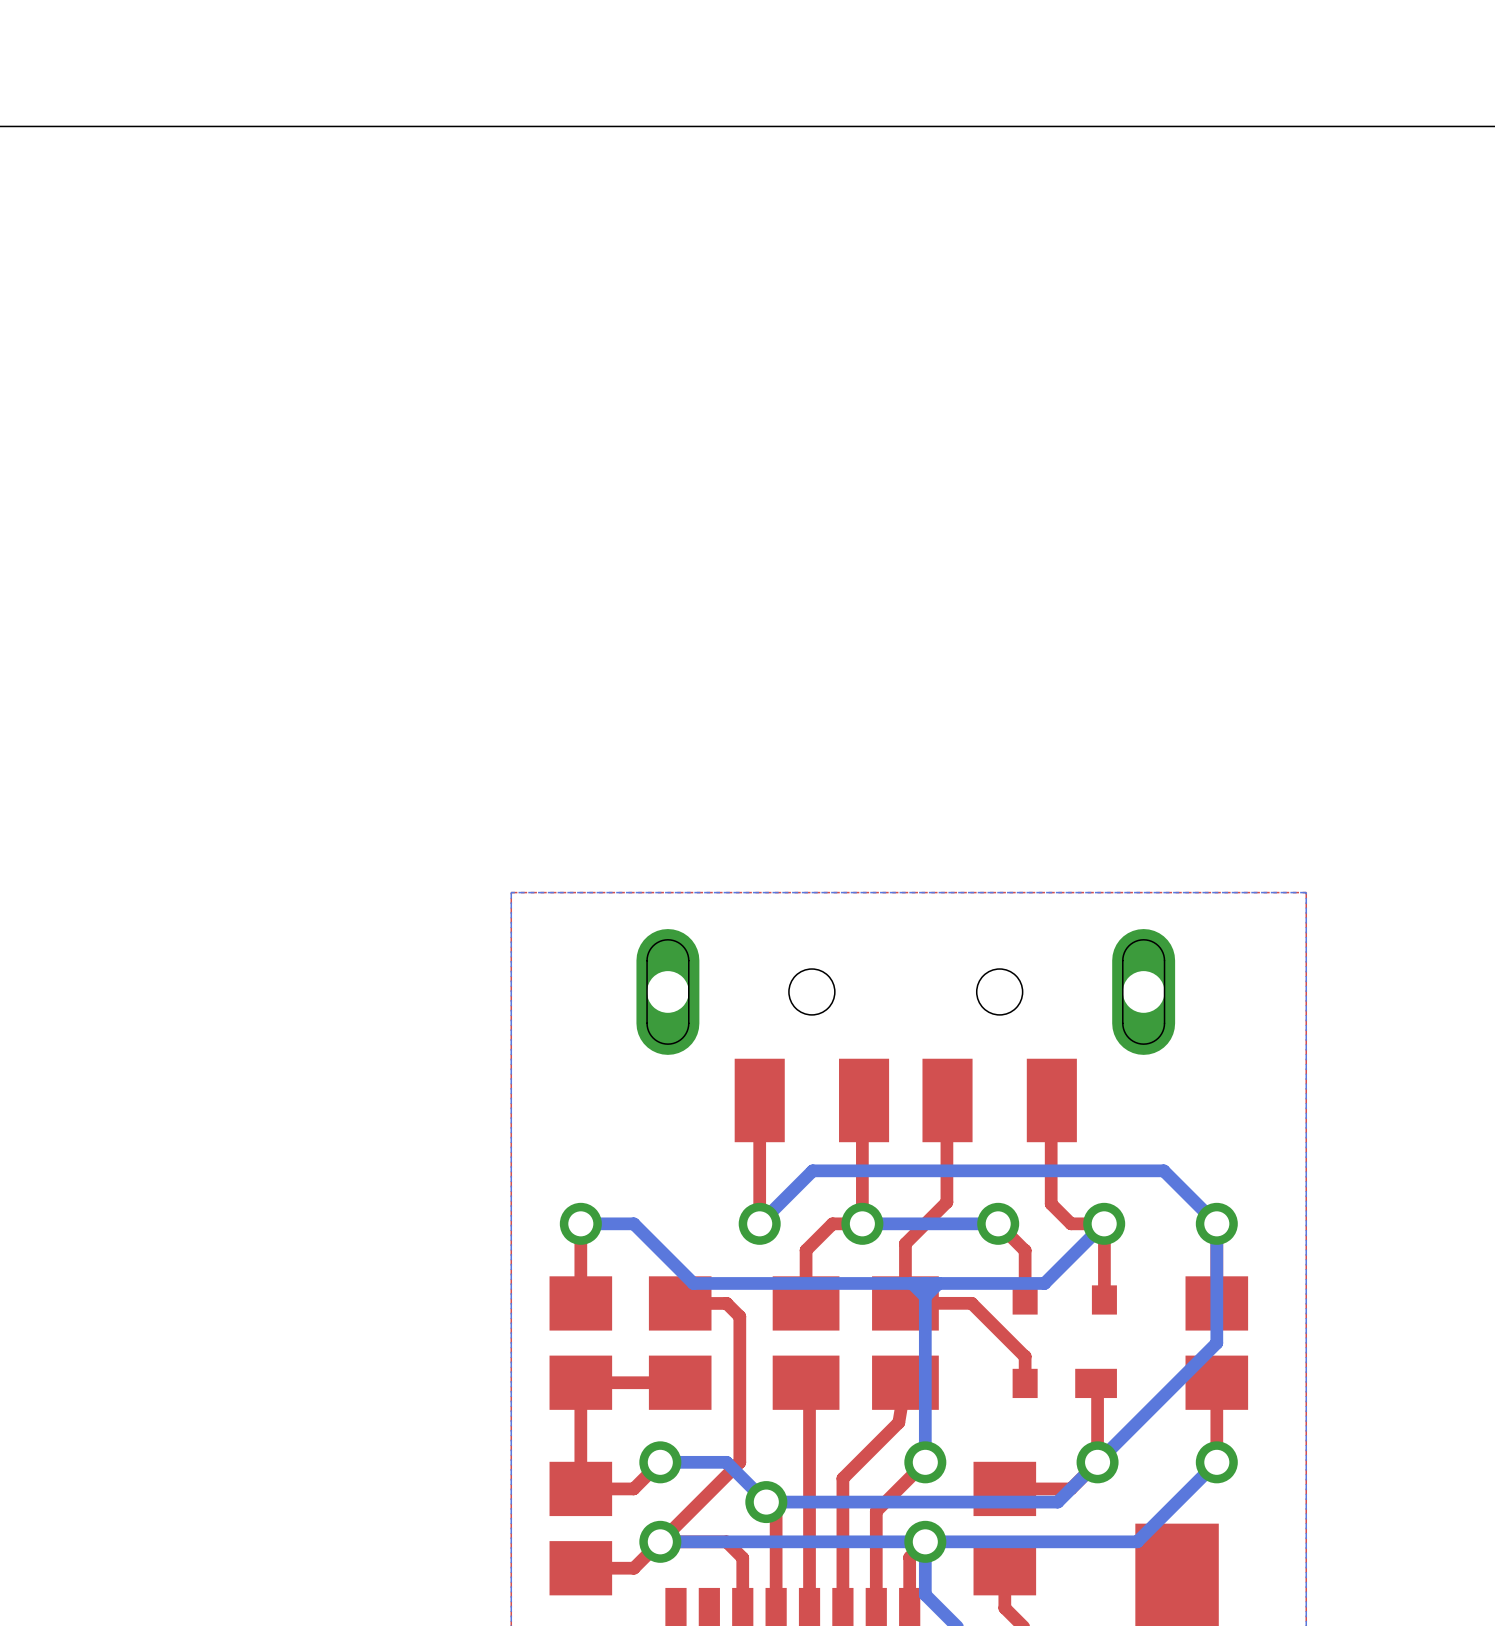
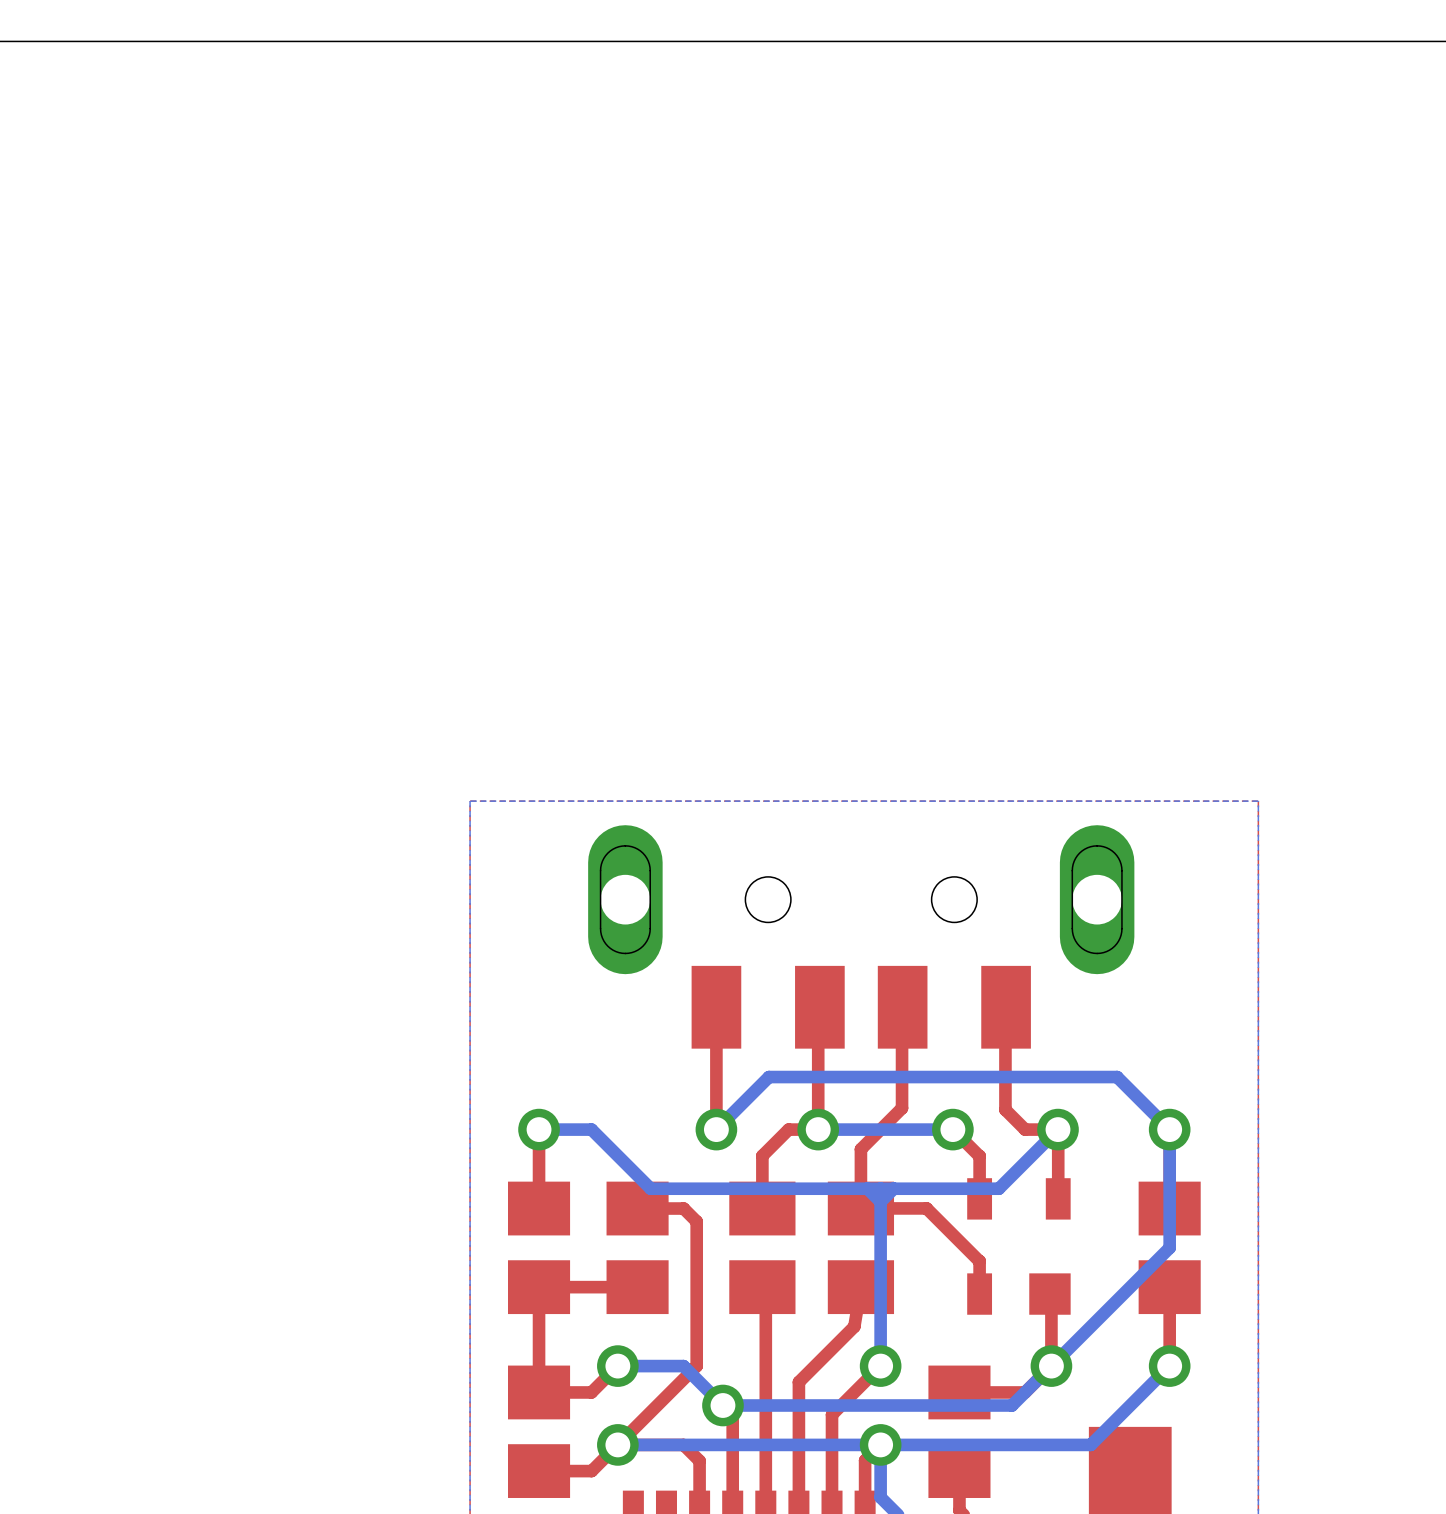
part footprint: [636, 929, 1176, 1143] -> [588, 825, 1135, 1049]
part footprint: [1012, 1285, 1117, 1399] -> [967, 1178, 1071, 1315]

